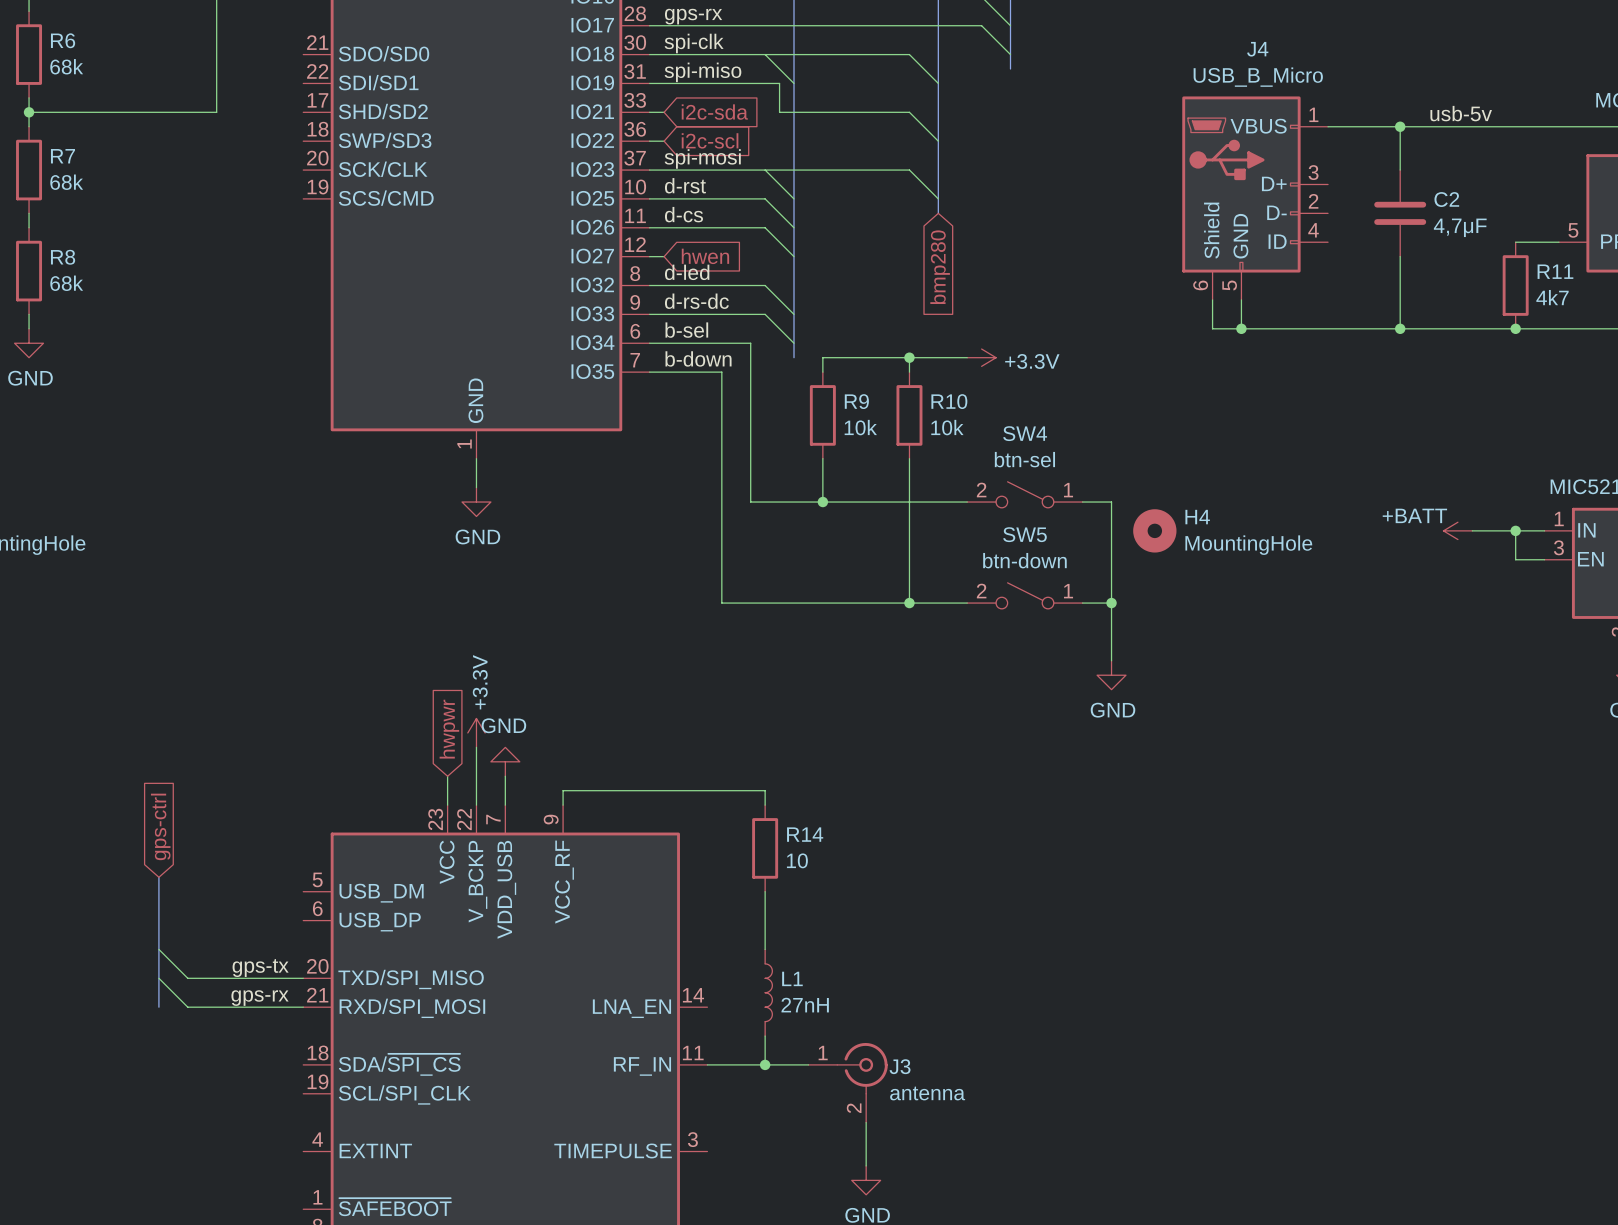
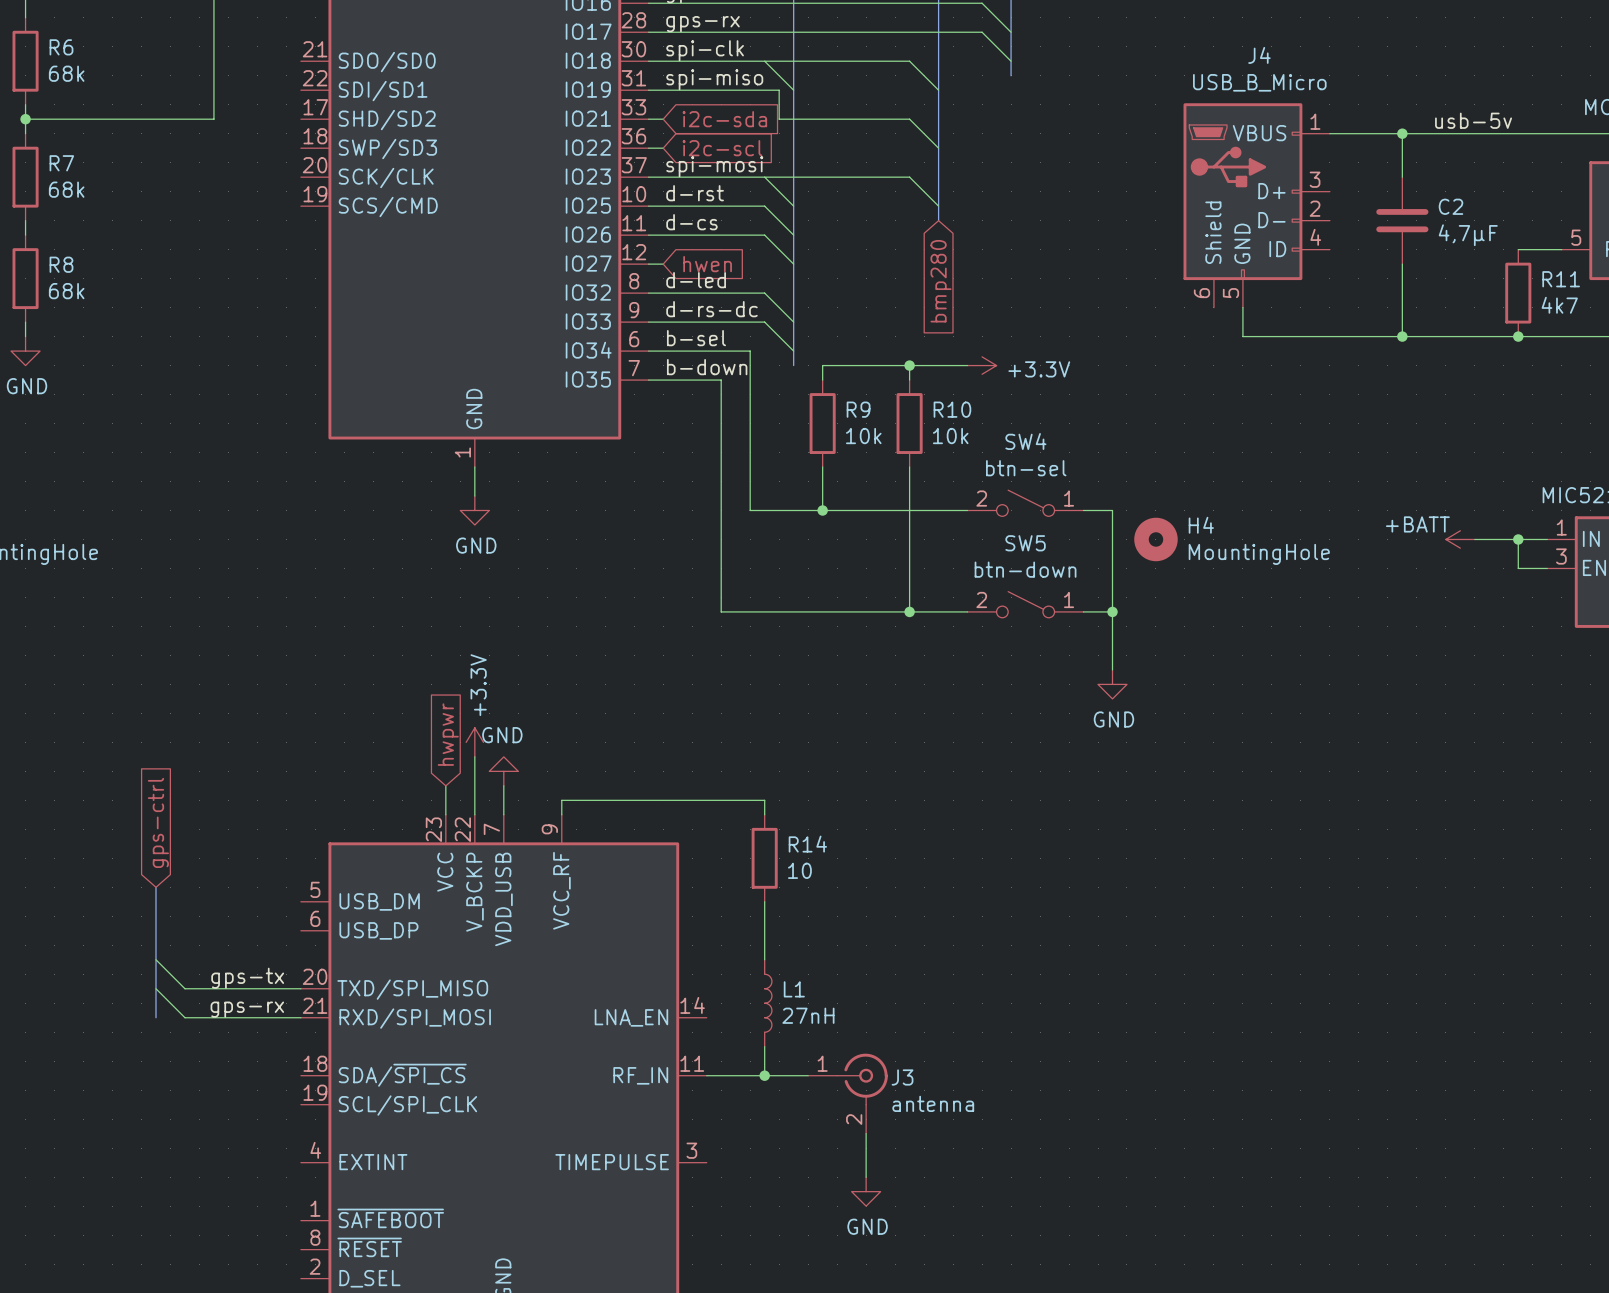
wire: (1212, 299) (1212, 328) (1241, 328) -> none
junction: (1241, 328) -> none

